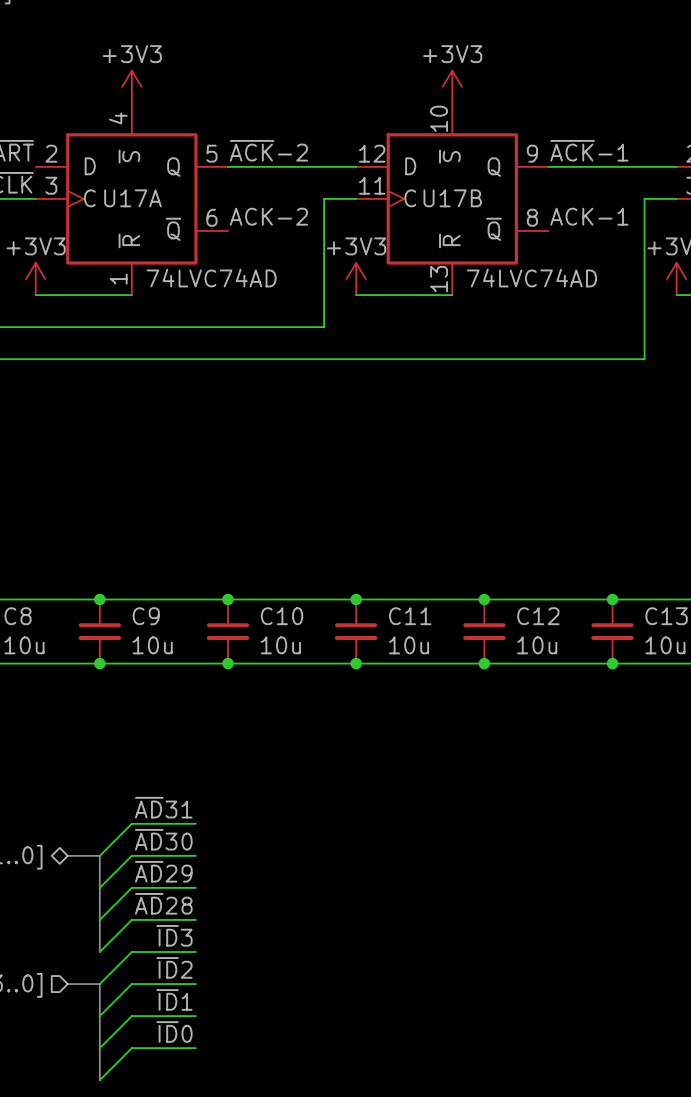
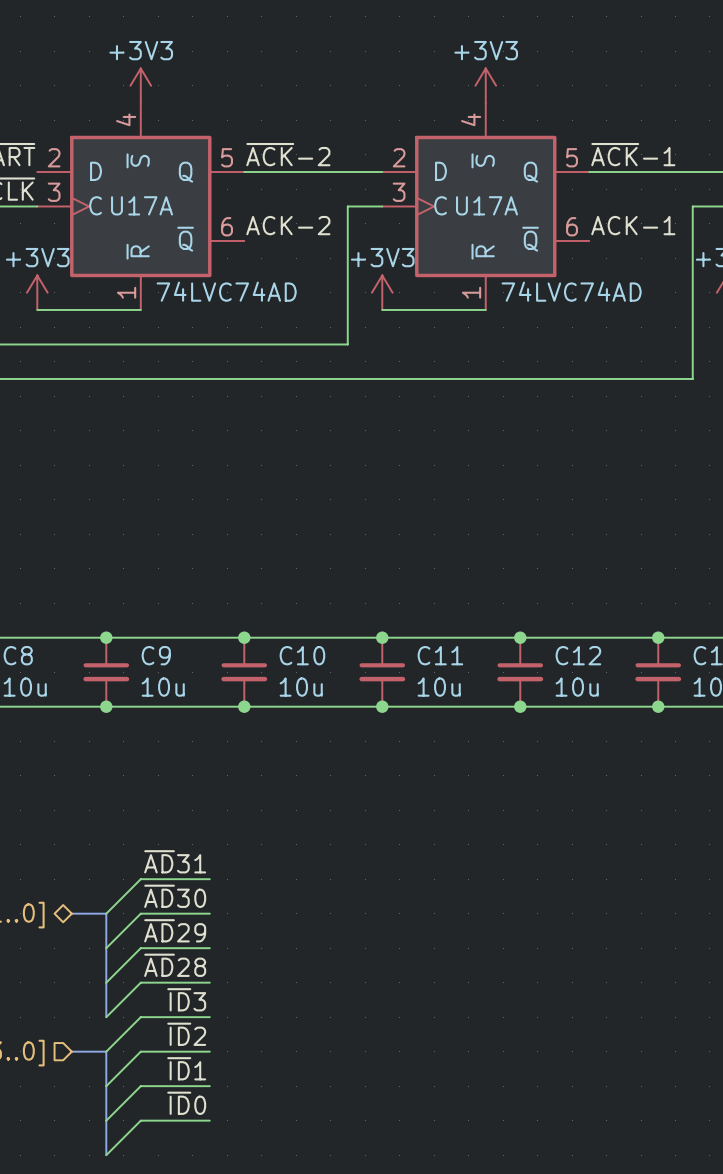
U17B pin number: 10 (439, 118) -> 4 (471, 119)
U17B pin number: 12 (372, 153) -> 2 (399, 157)
U17B pin number: 9 (532, 153) -> 5 (572, 157)
U17B pin number: 11 (372, 185) -> 3 (399, 192)
U17B name: U17B (452, 198) -> U17A (487, 205)
U17B pin number: 8 (532, 217) -> 6 (572, 226)
U17B pin number: 13 (439, 279) -> 1 (471, 292)

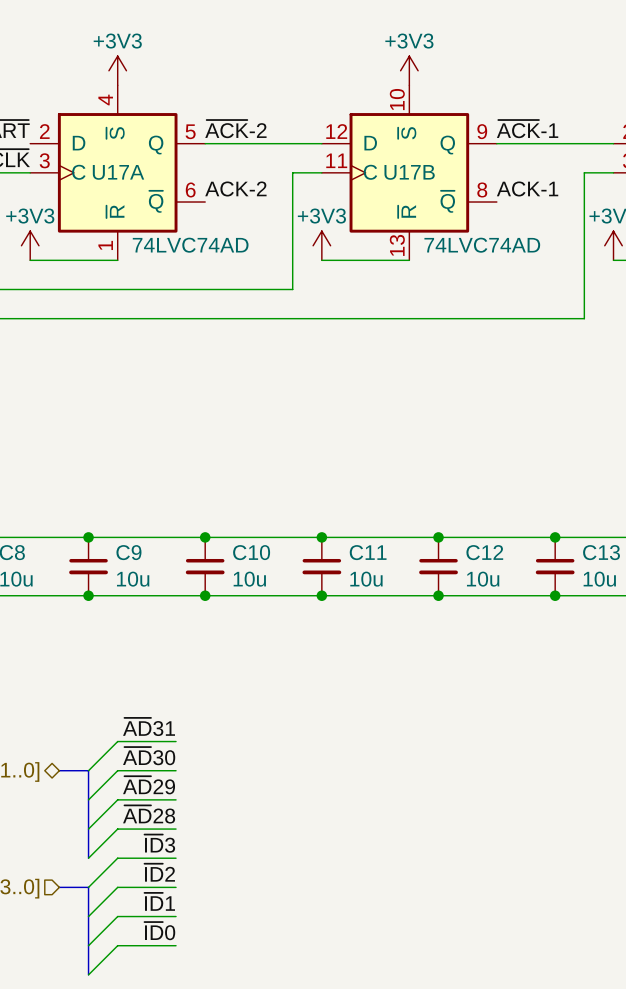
U17A pin number: 4 (471, 119) -> 10 (397, 99)
U17A pin number: 2 (399, 157) -> 12 (336, 131)
U17A pin number: 5 (572, 157) -> 9 (482, 131)
U17A pin number: 3 (399, 192) -> 11 (336, 160)
U17A name: U17A (487, 205) -> U17B (409, 172)
U17A pin number: 6 (572, 226) -> 8 (482, 189)
U17A pin number: 1 (471, 292) -> 13 (397, 245)

